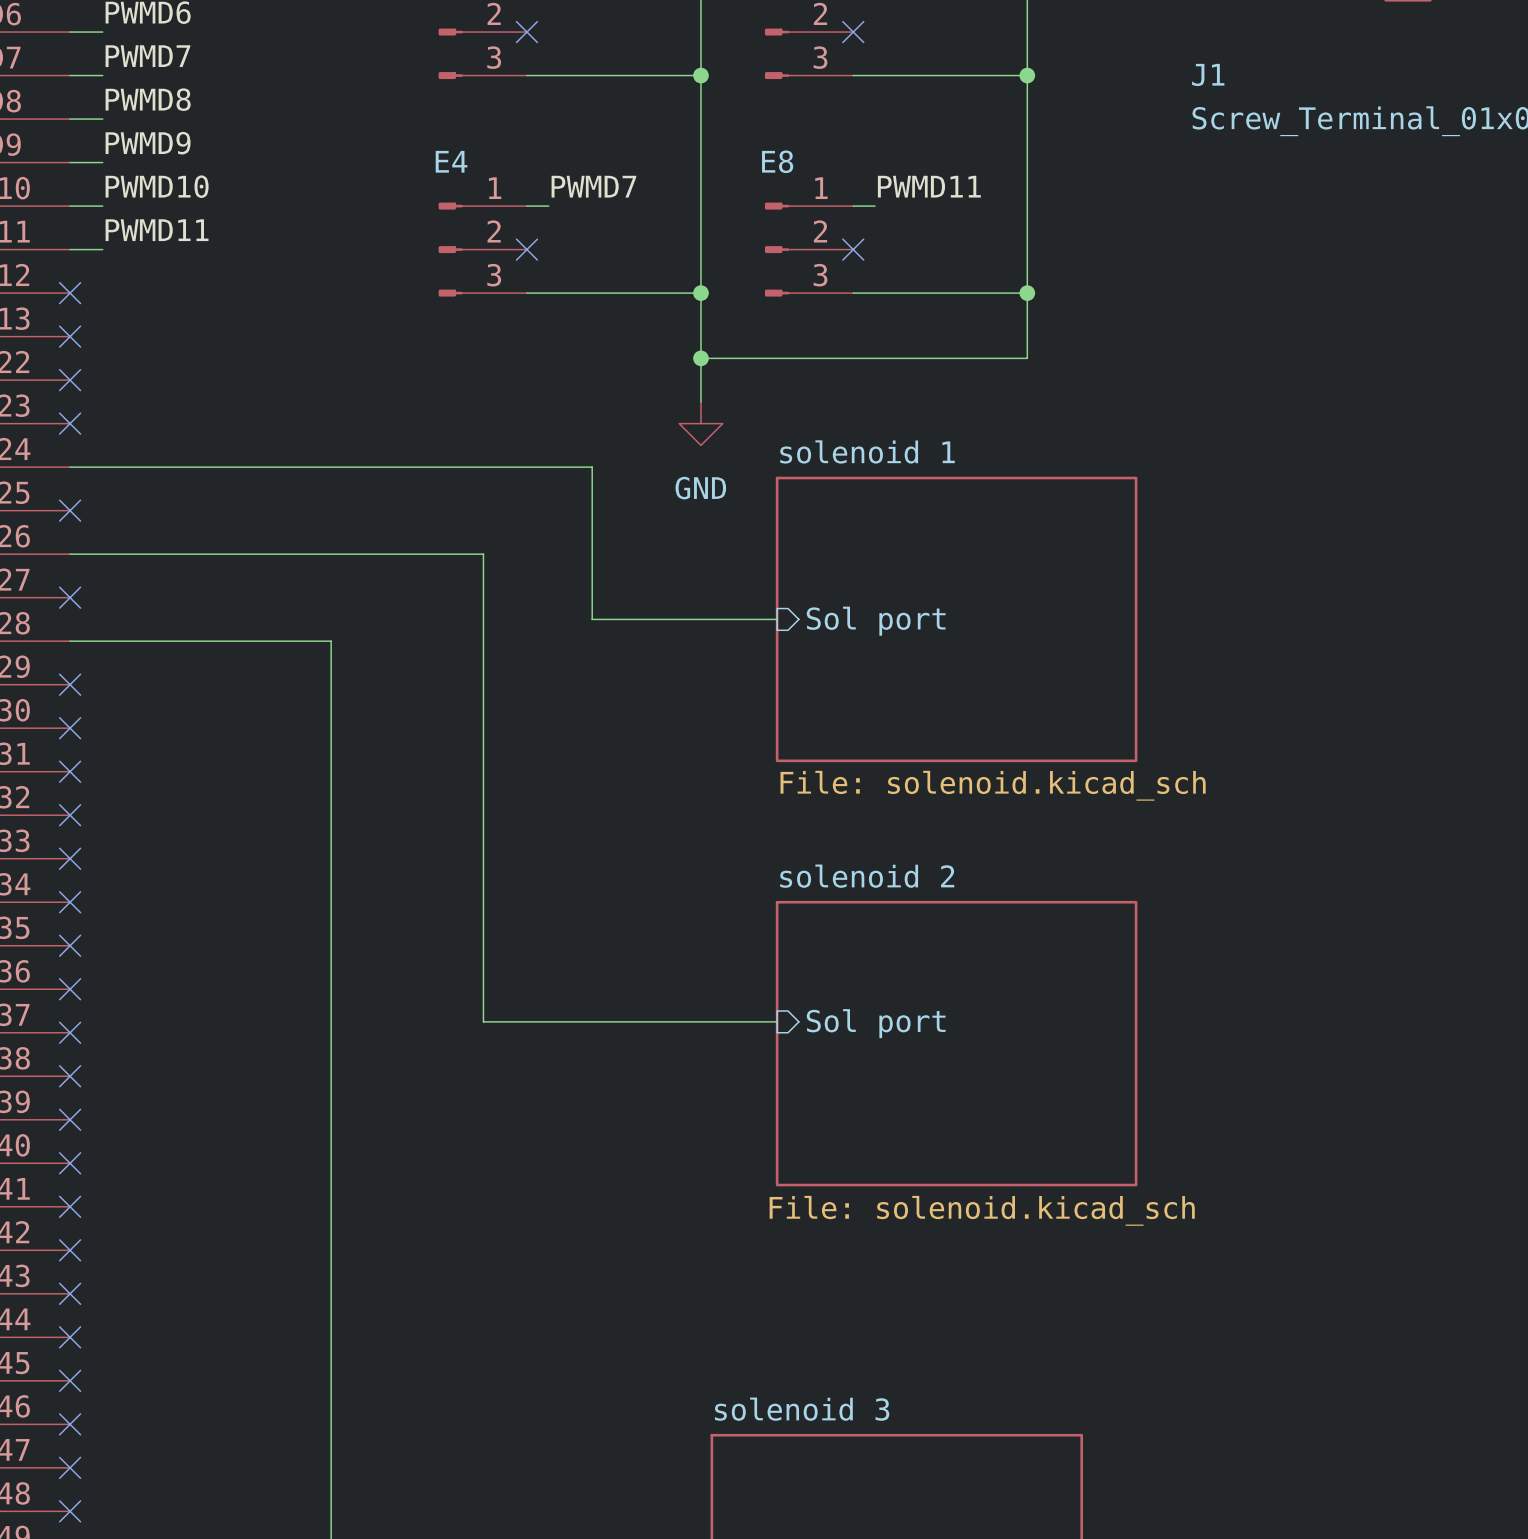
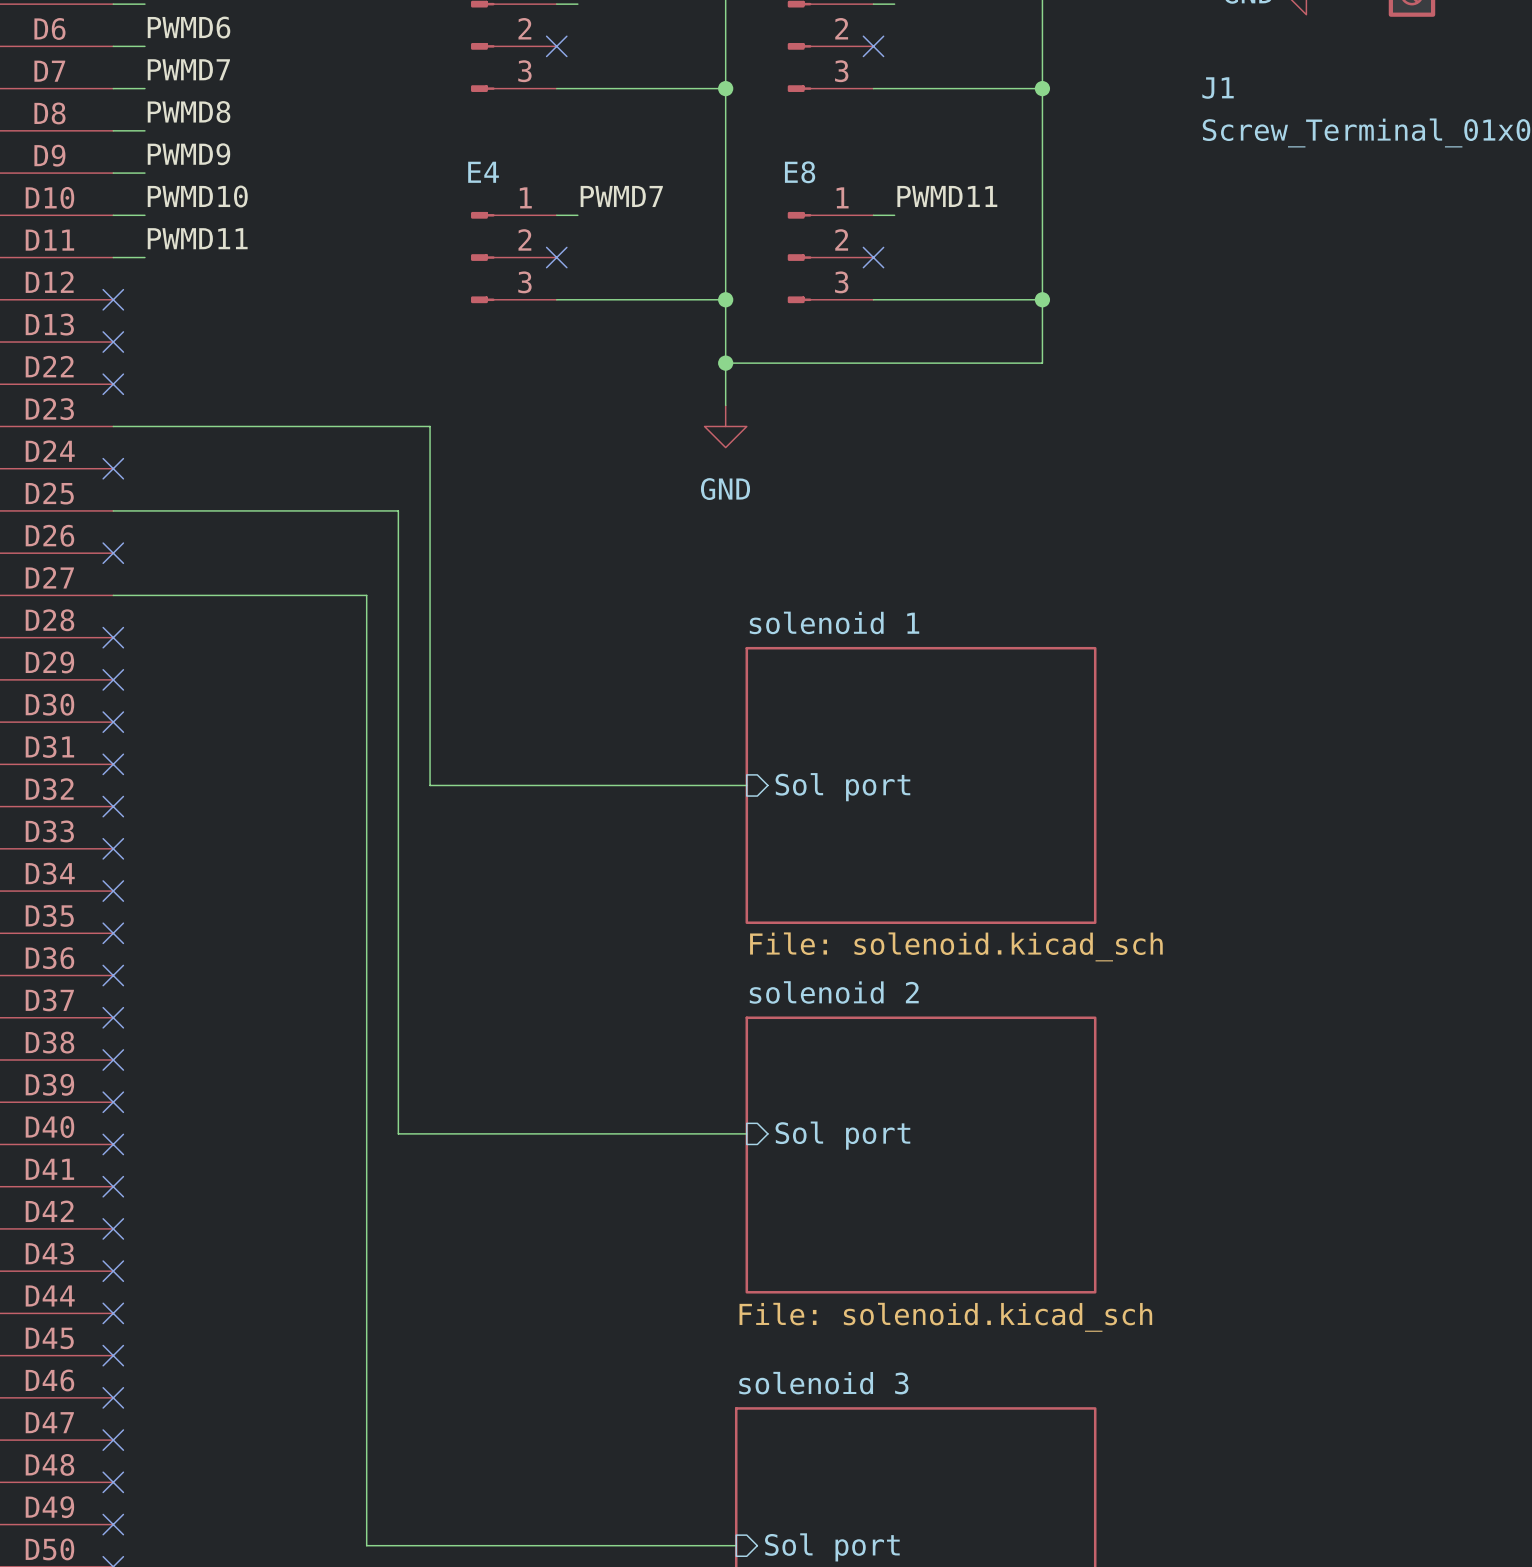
wire: none -> (113, 426) (430, 426) (430, 785) (746, 785)
no-connect mark: (70, 423) -> none
wire: (70, 467) (592, 467) (592, 619) (777, 619) -> none
no-connect mark: none -> (113, 468)
wire: none -> (113, 510) (398, 510) (398, 1133) (746, 1133)
no-connect mark: (70, 510) -> none
wire: (70, 554) (483, 554) (483, 1021) (777, 1021) -> none
no-connect mark: none -> (113, 553)
no-connect mark: (70, 597) -> none
sheet solenoid 1 position: (956, 619) -> (921, 785)
sheet pin: Sol port (876, 621) -> none
wire: (70, 641) (331, 641) -> (113, 595) (366, 595) (366, 637)
no-connect mark: none -> (113, 637)
sheet pin: none -> Sol port (842, 787)
sheet pin: Sol port (876, 1023) -> none
sheet solenoid 2 position: (956, 1043) -> (921, 1155)
sheet pin: none -> Sol port (842, 1135)

